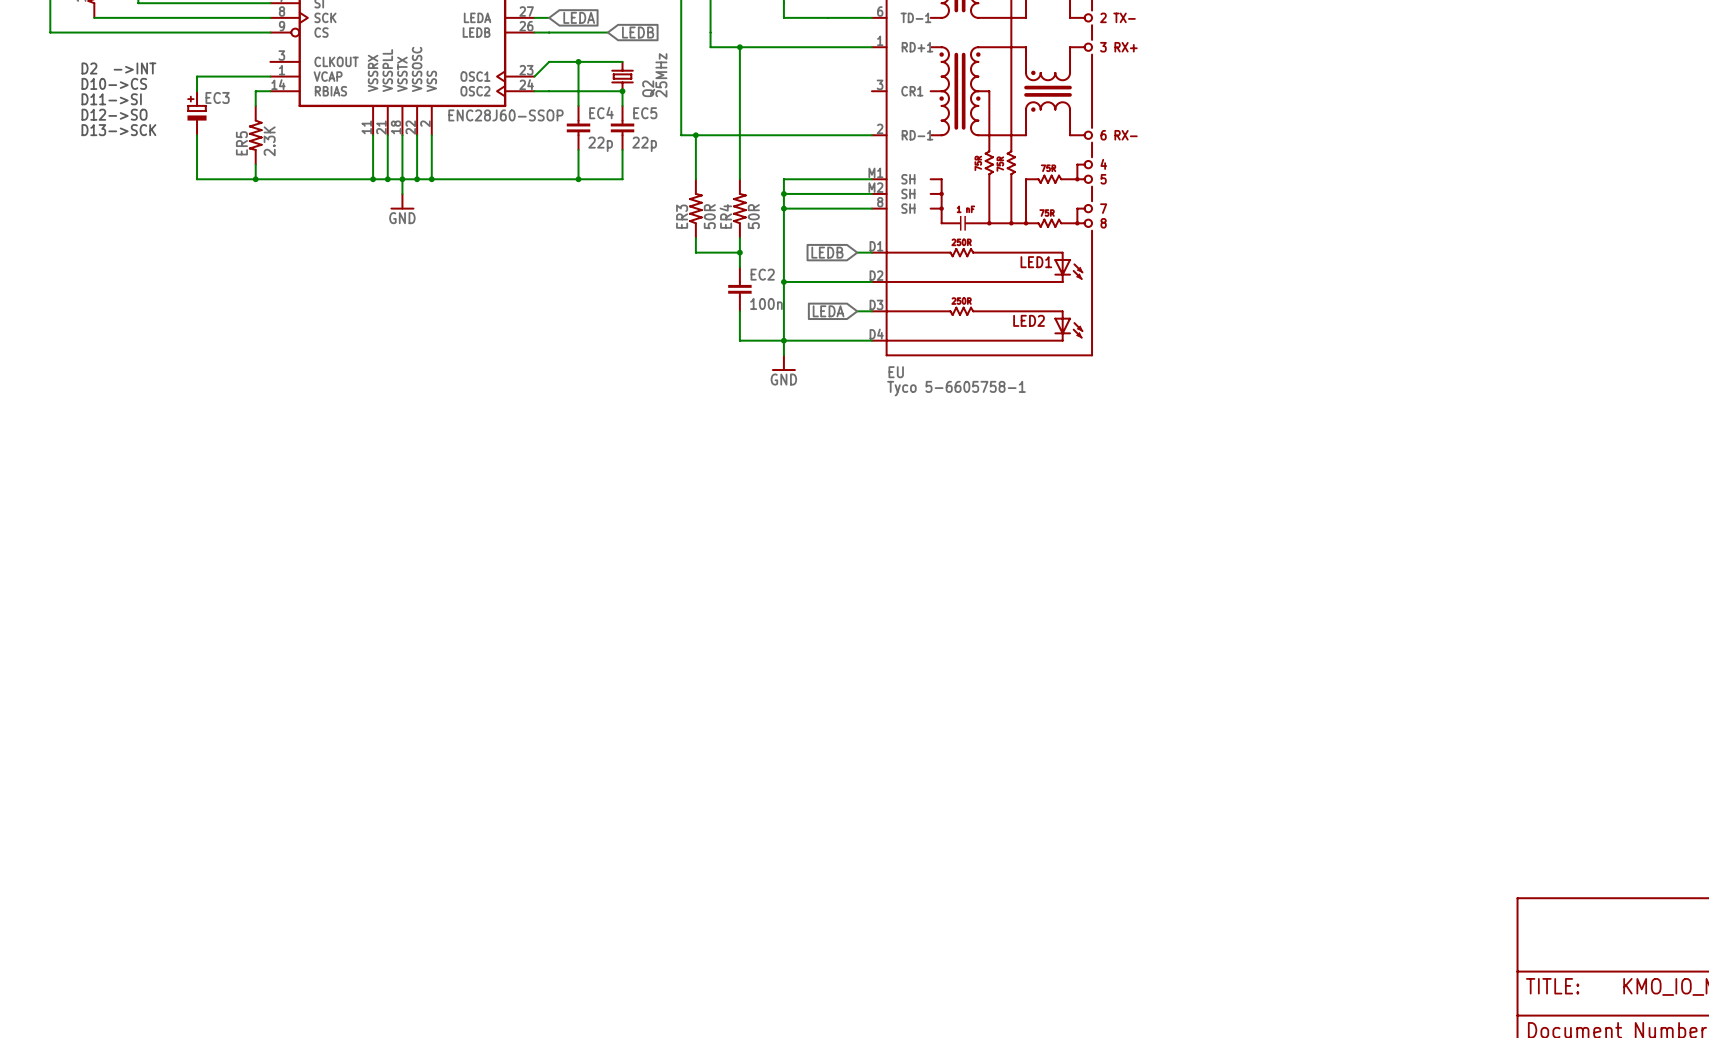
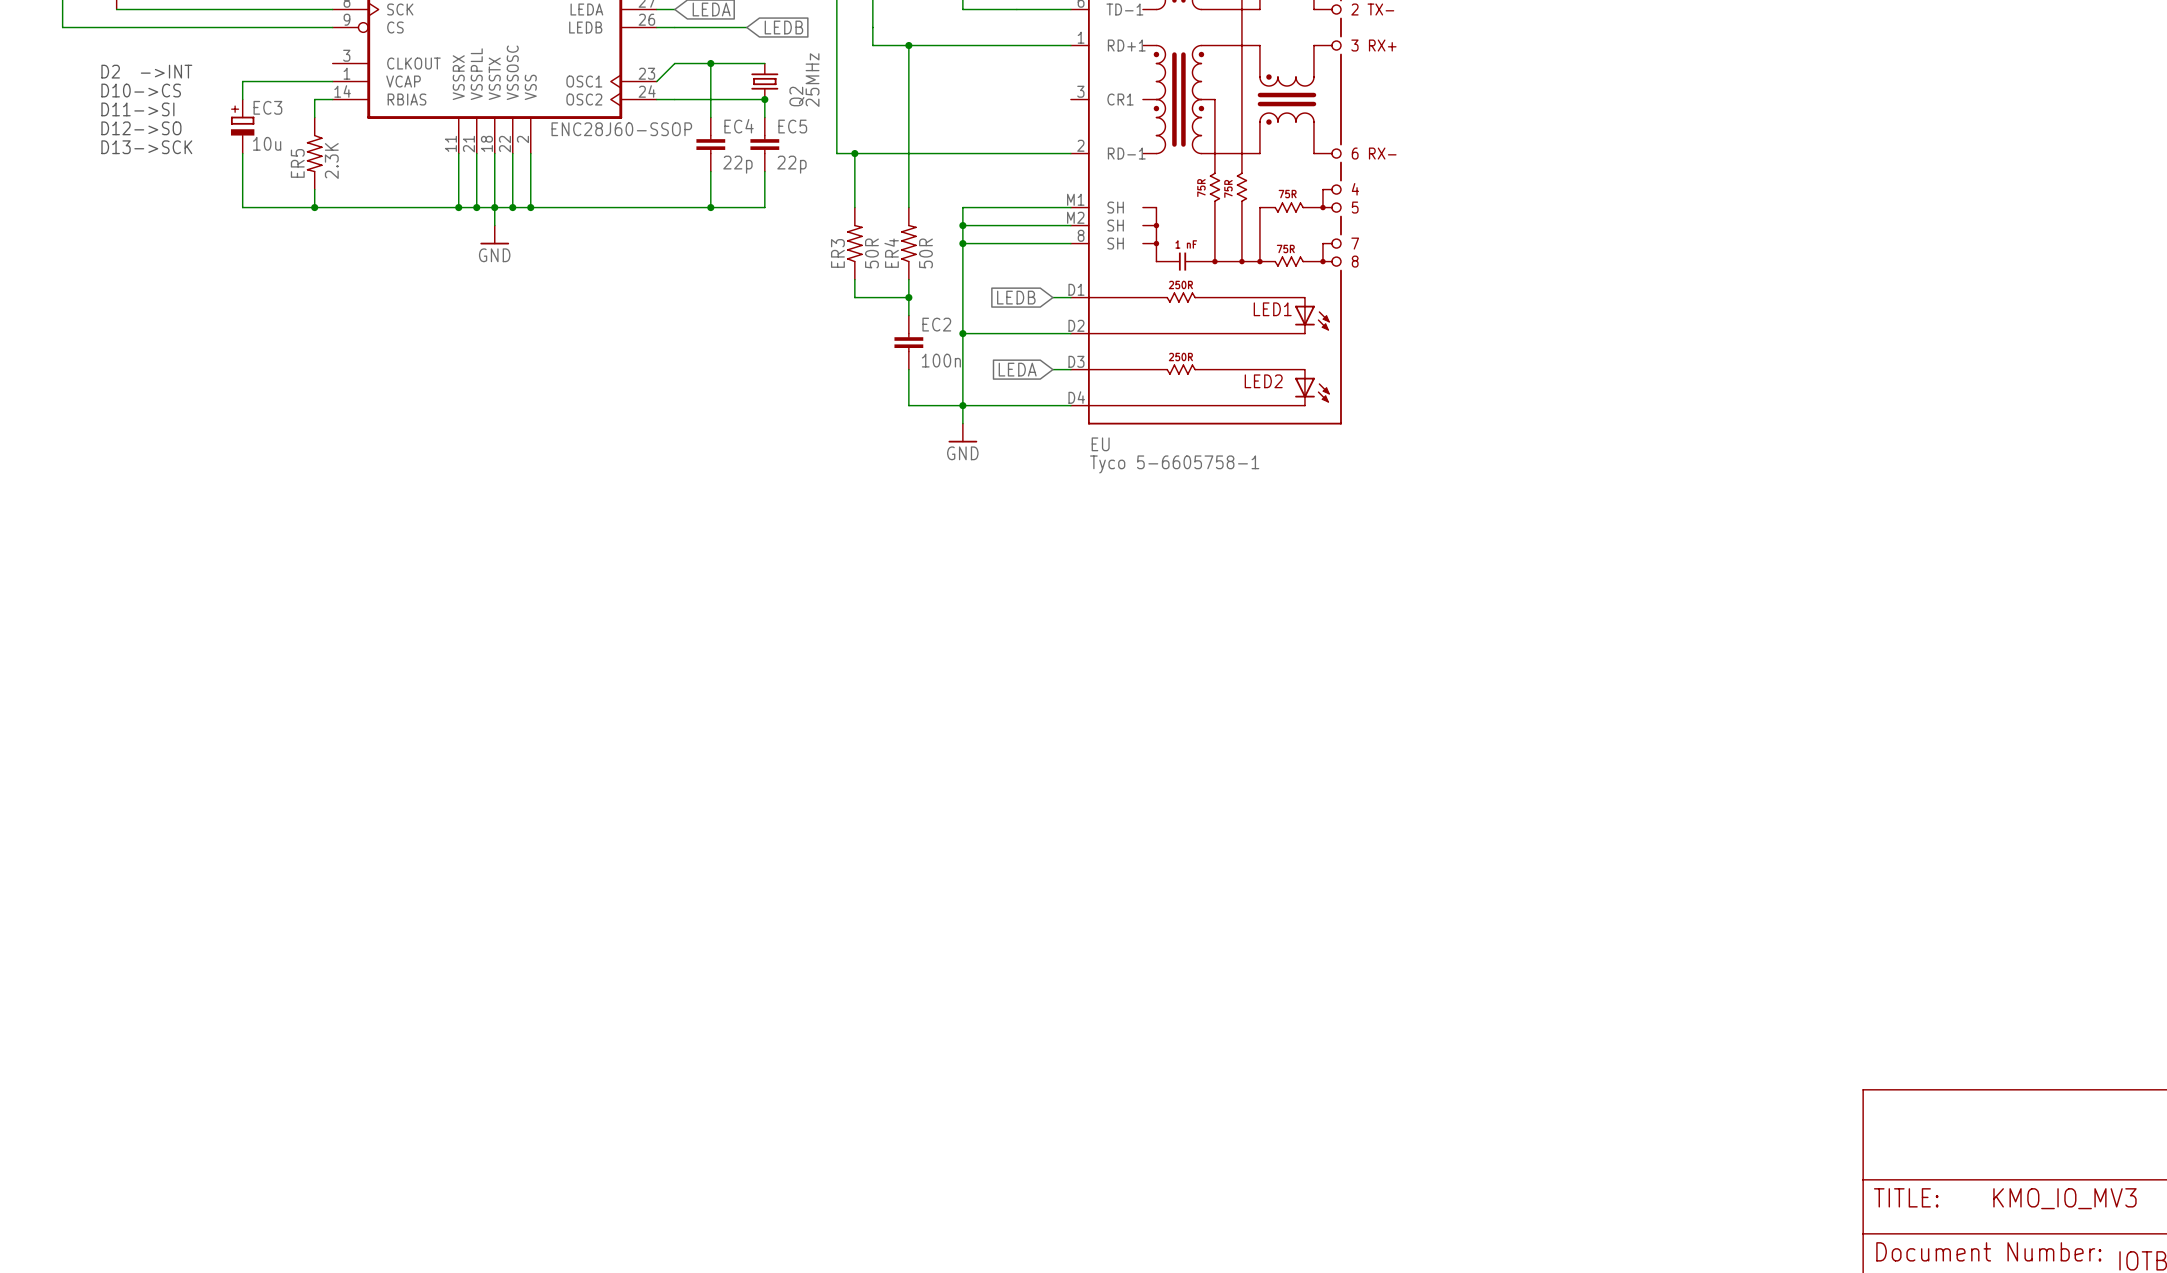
EC3 value: none -> 10u (267, 143)

